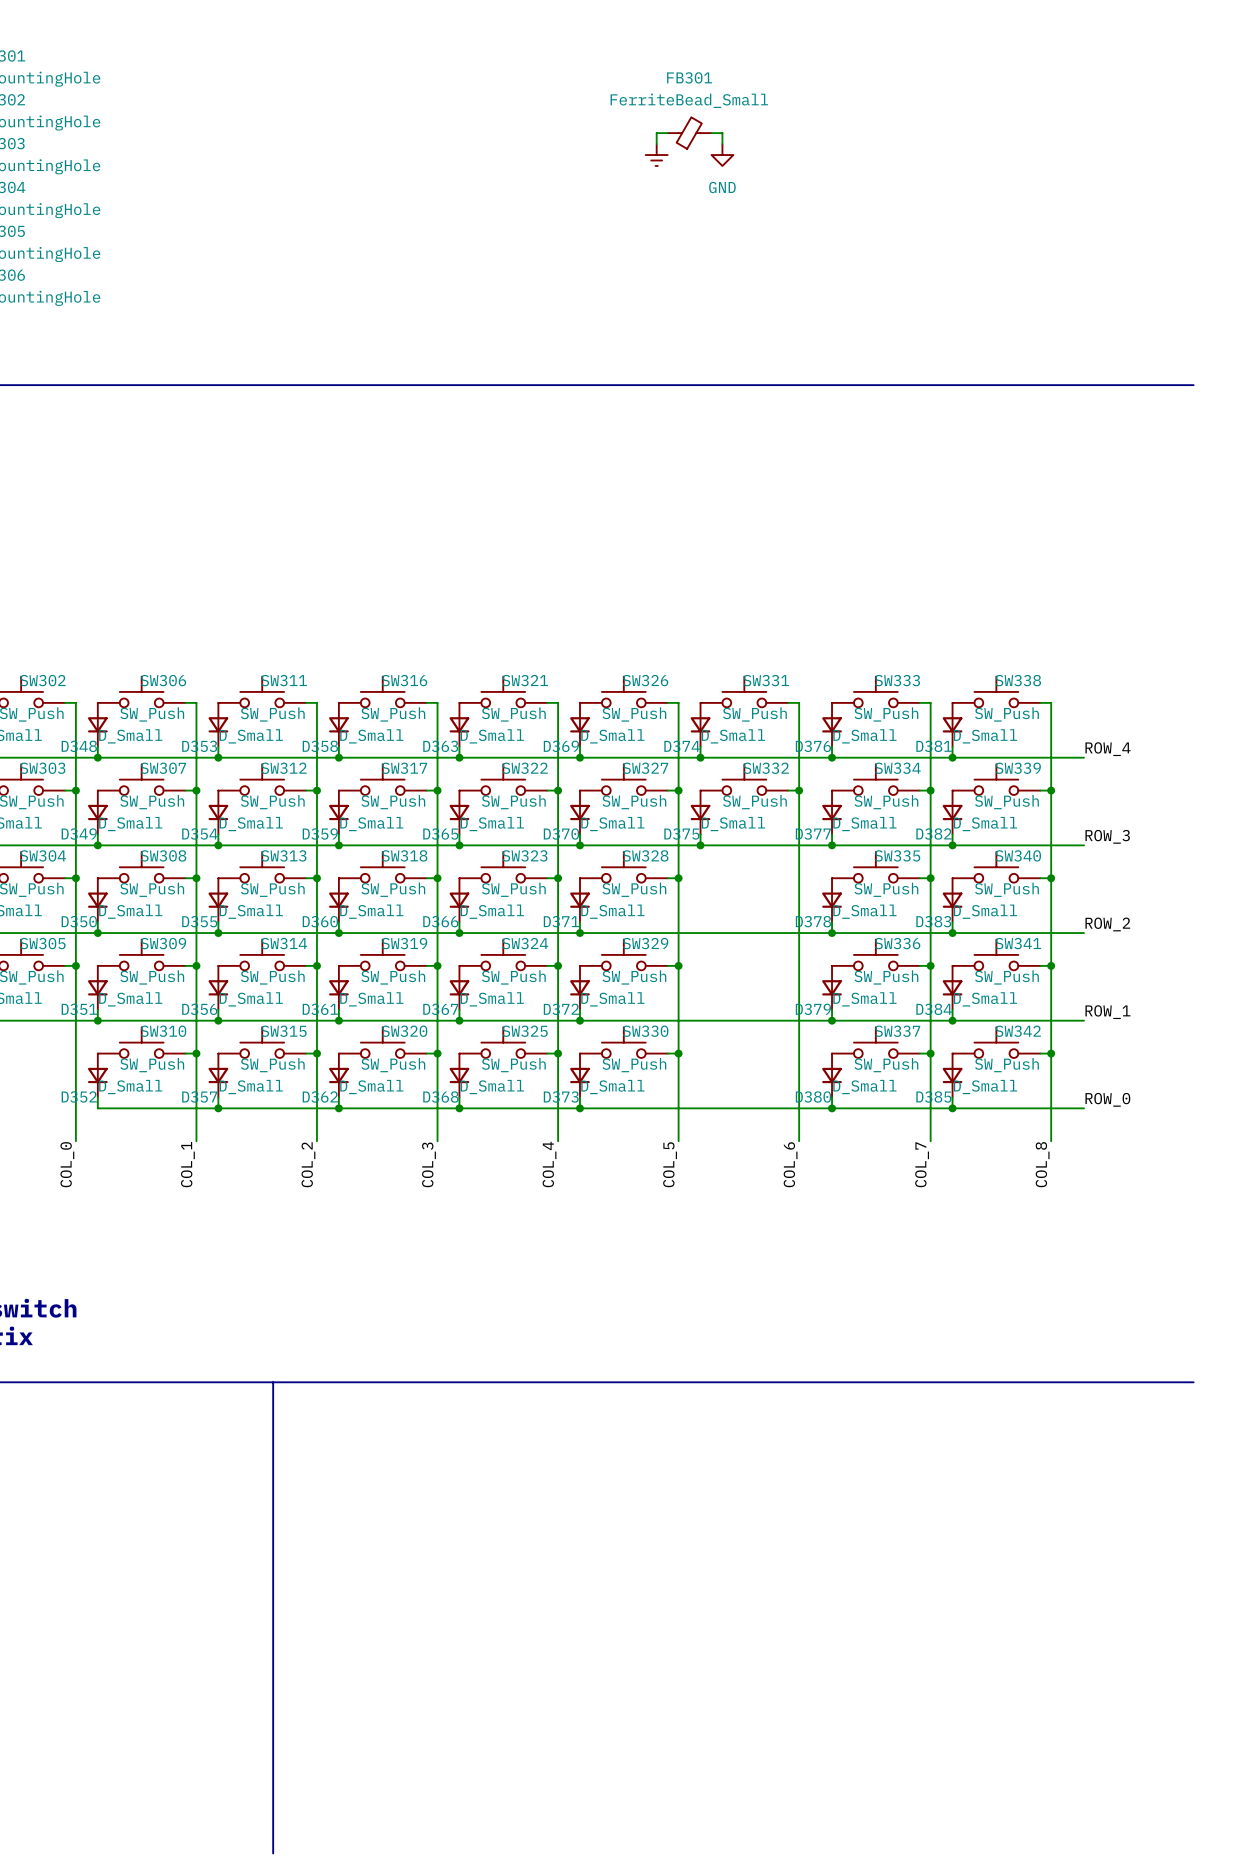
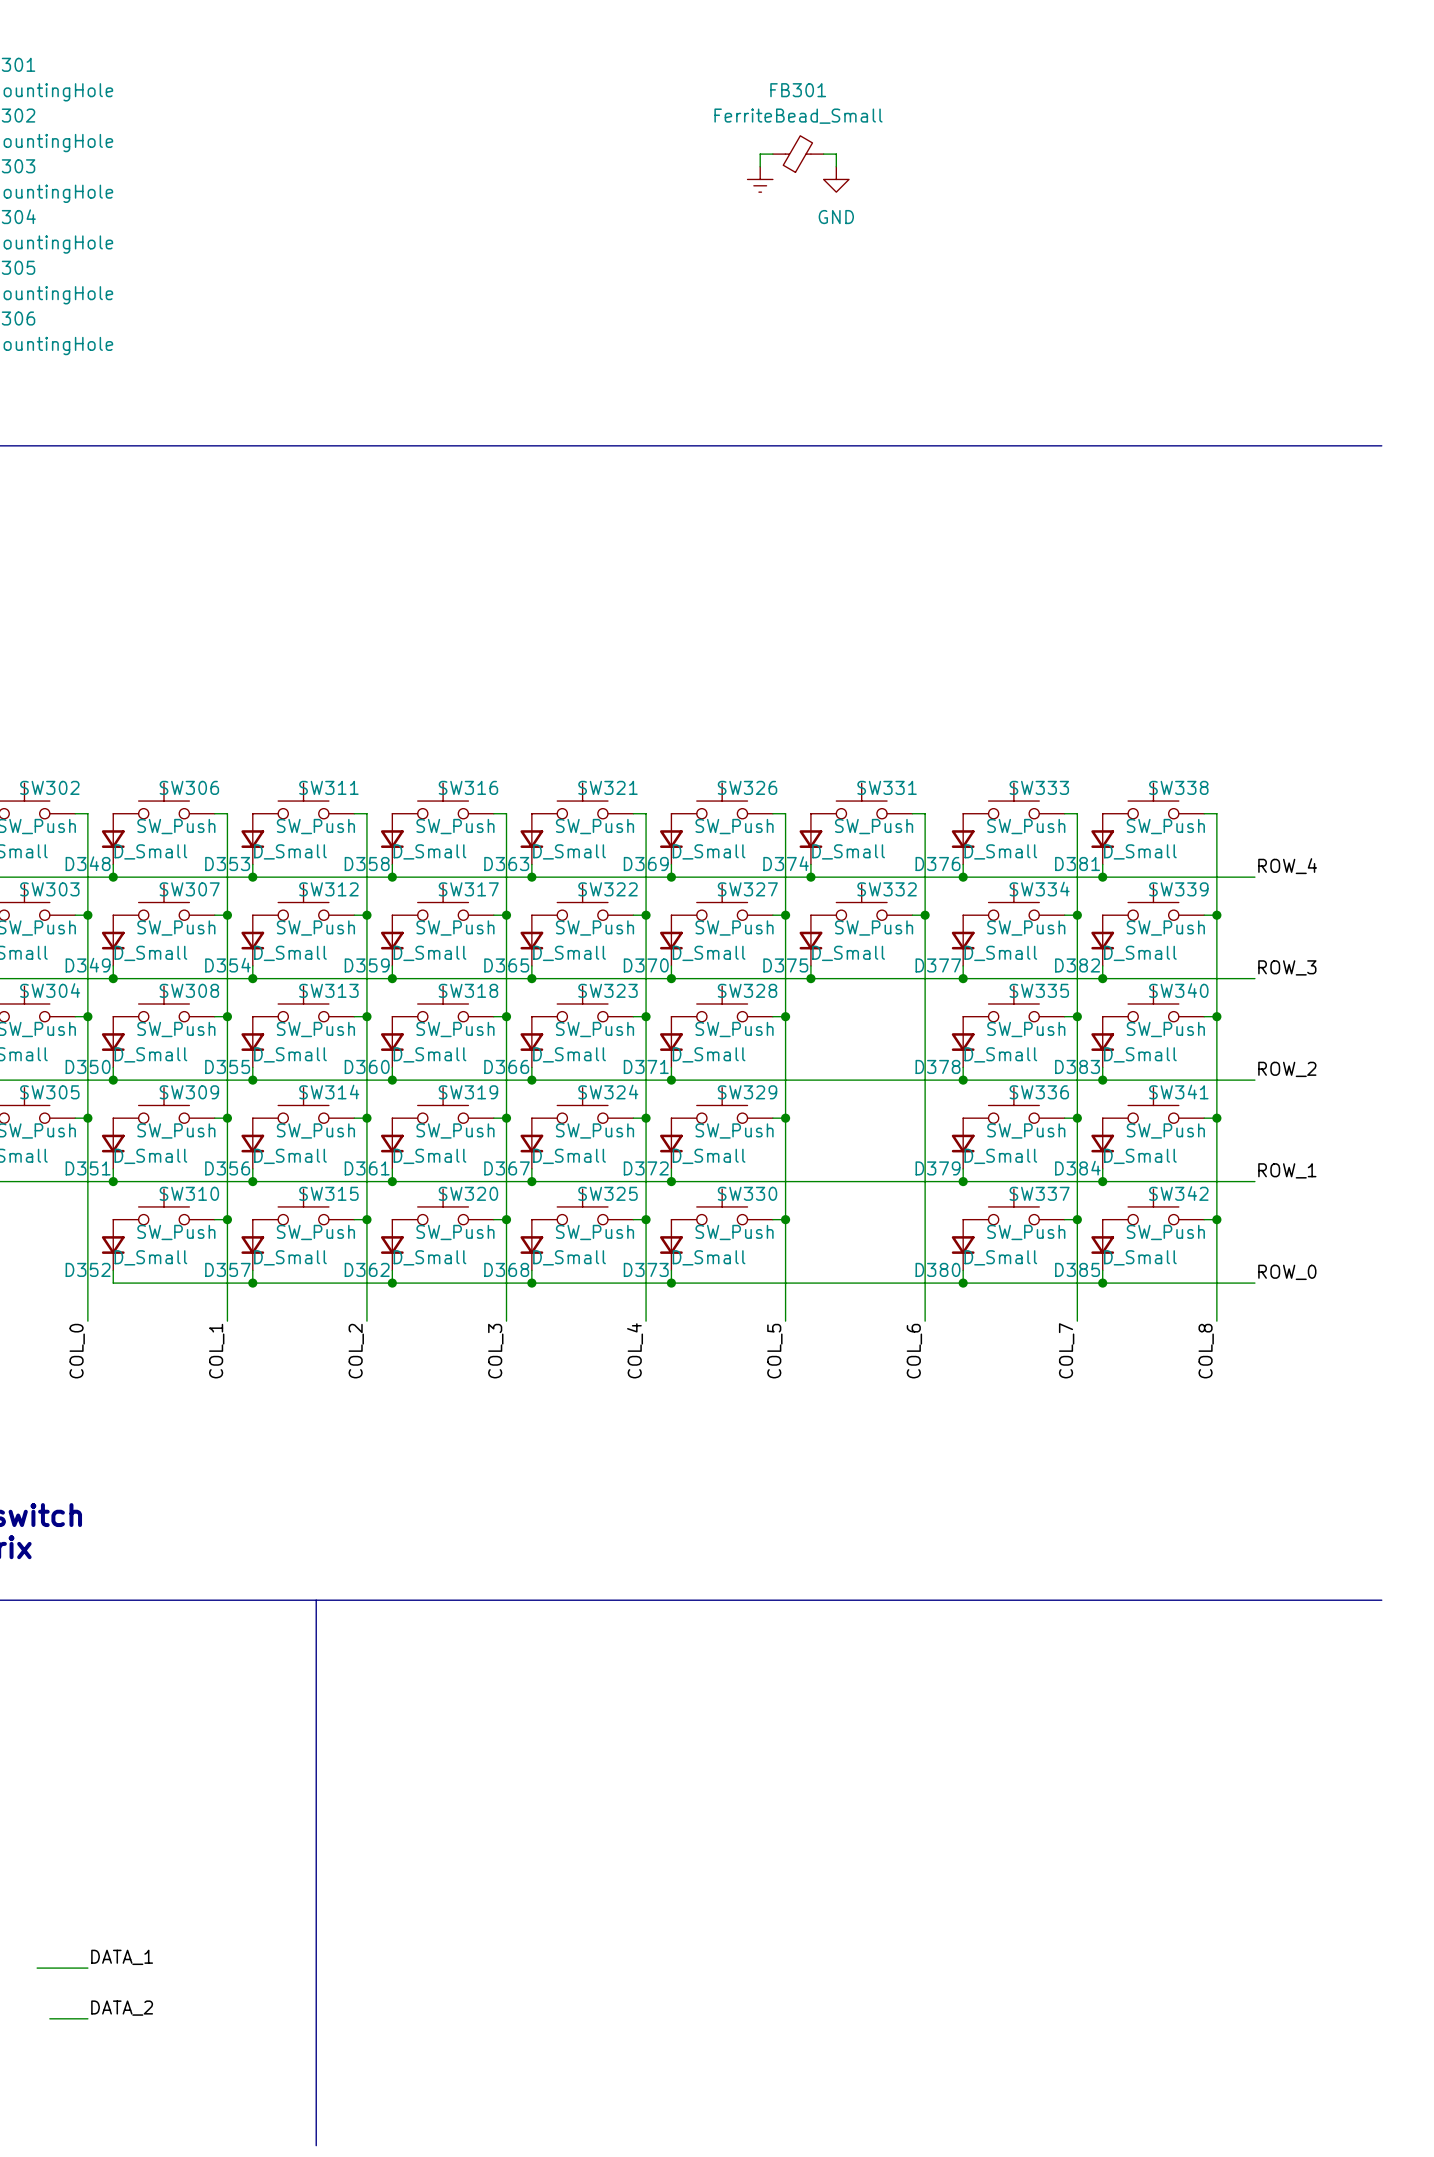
label: none -> DATA_1 (122, 1957)
wire: none -> (37, 1968) (87, 1968)
label: none -> DATA_2 (122, 2008)
wire: none -> (49, 2018) (87, 2018)

